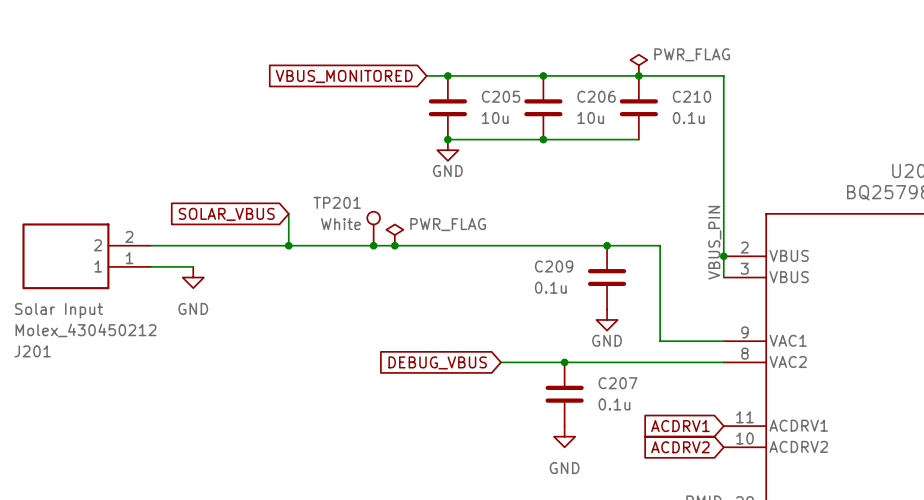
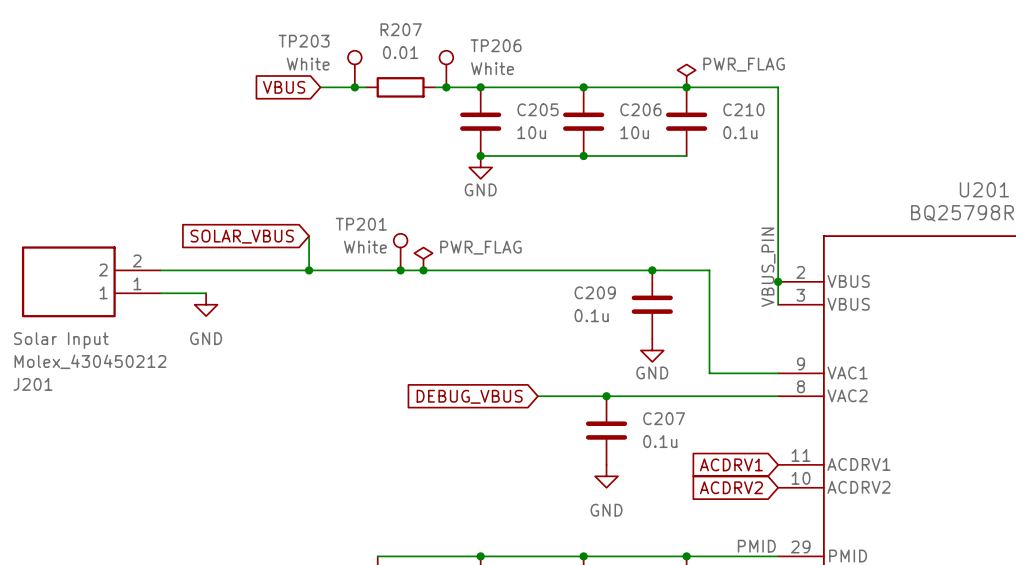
TP203: none -> White (354, 69)
TP206: none -> White (446, 69)
global label: none -> VBUS (284, 87)
wire: none -> (320, 87) (366, 87)
junction: none -> (354, 87)
R207: none -> 0.01 (400, 87)
wire: none -> (434, 87) (457, 87)
junction: none -> (446, 87)
global label: VBUS_MONITORED (344, 76) -> none

